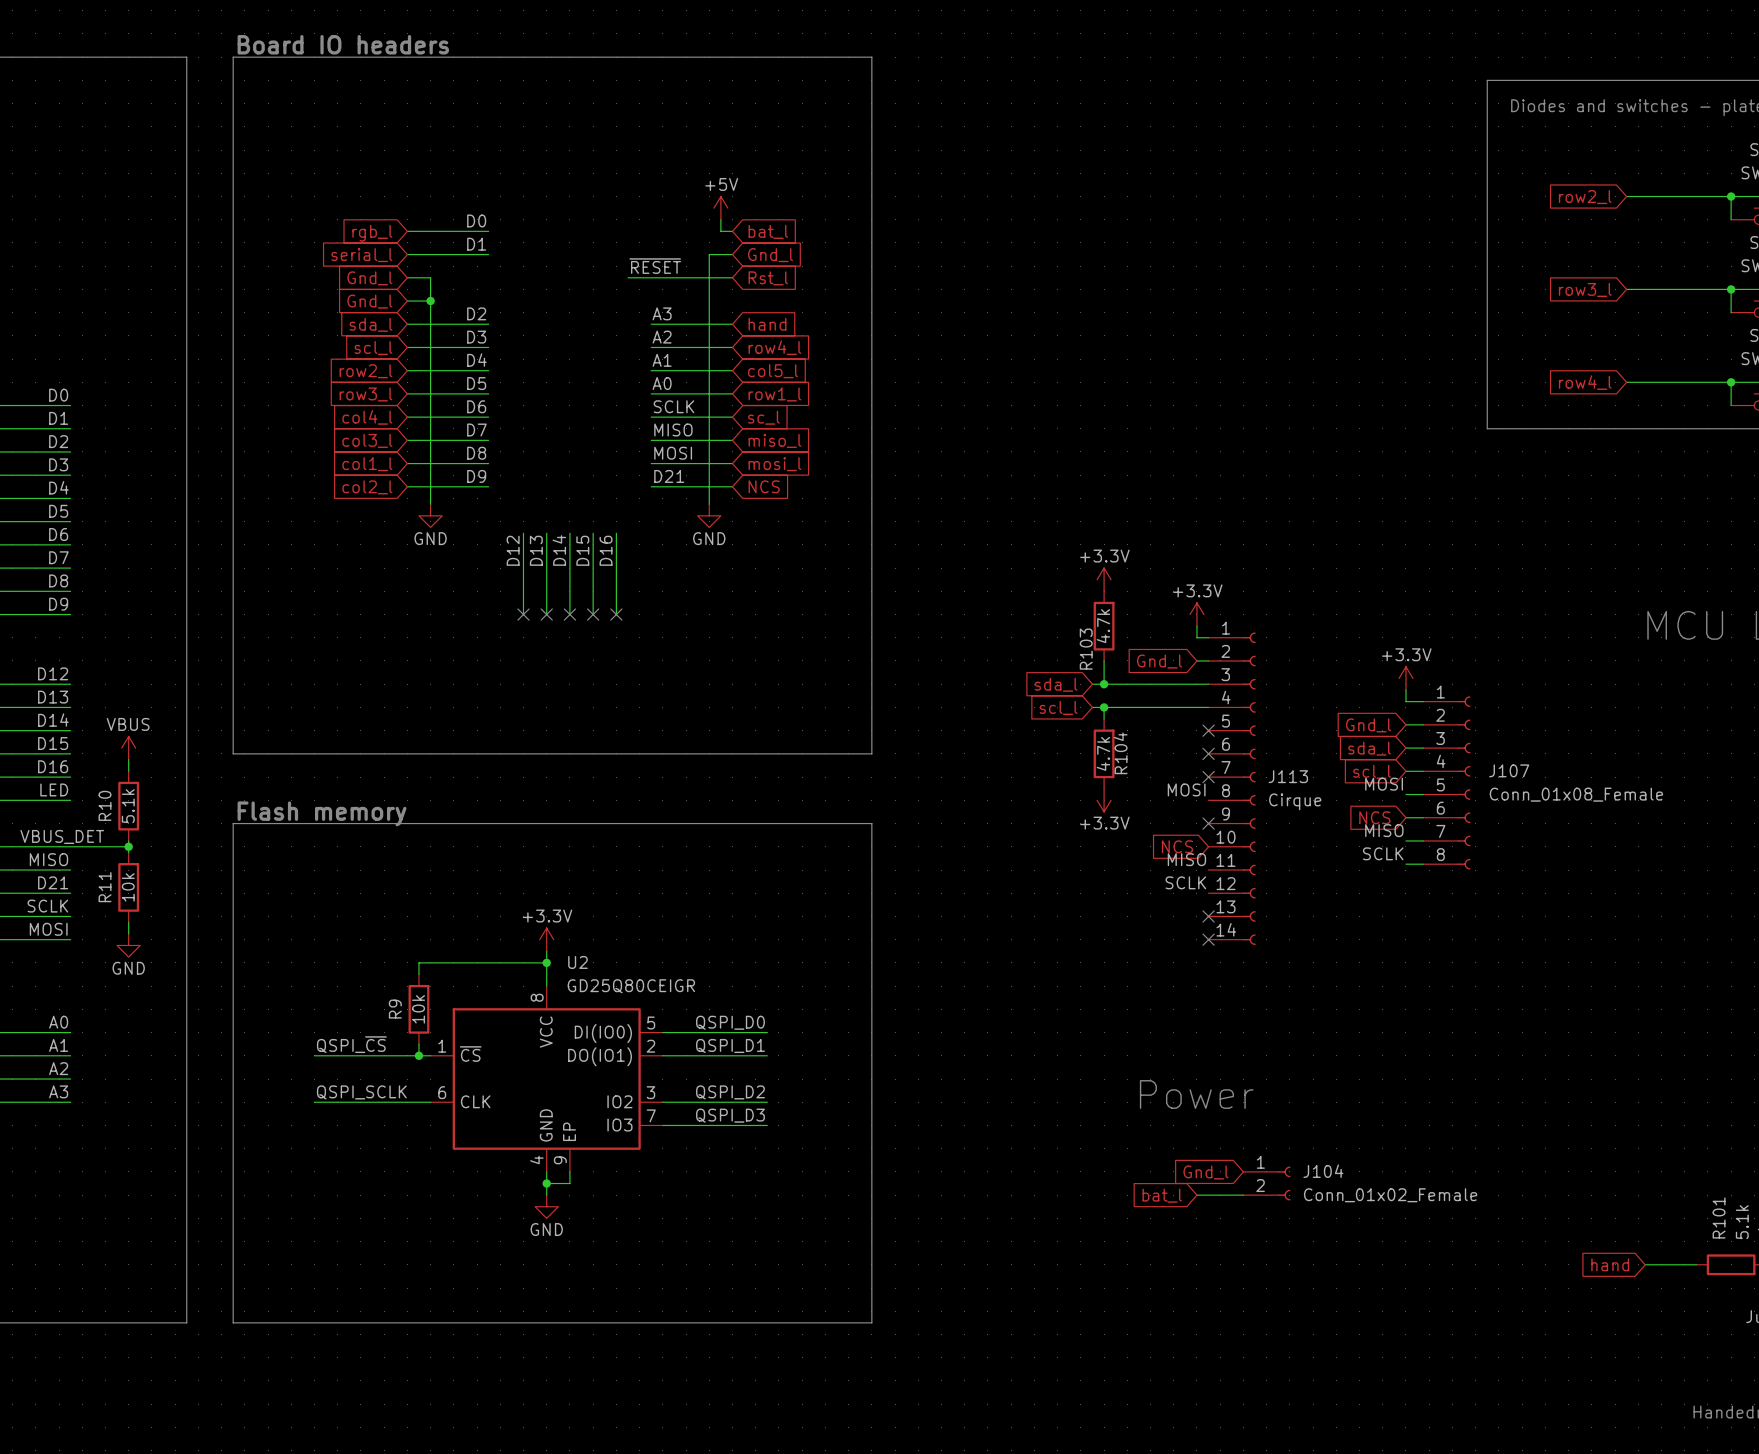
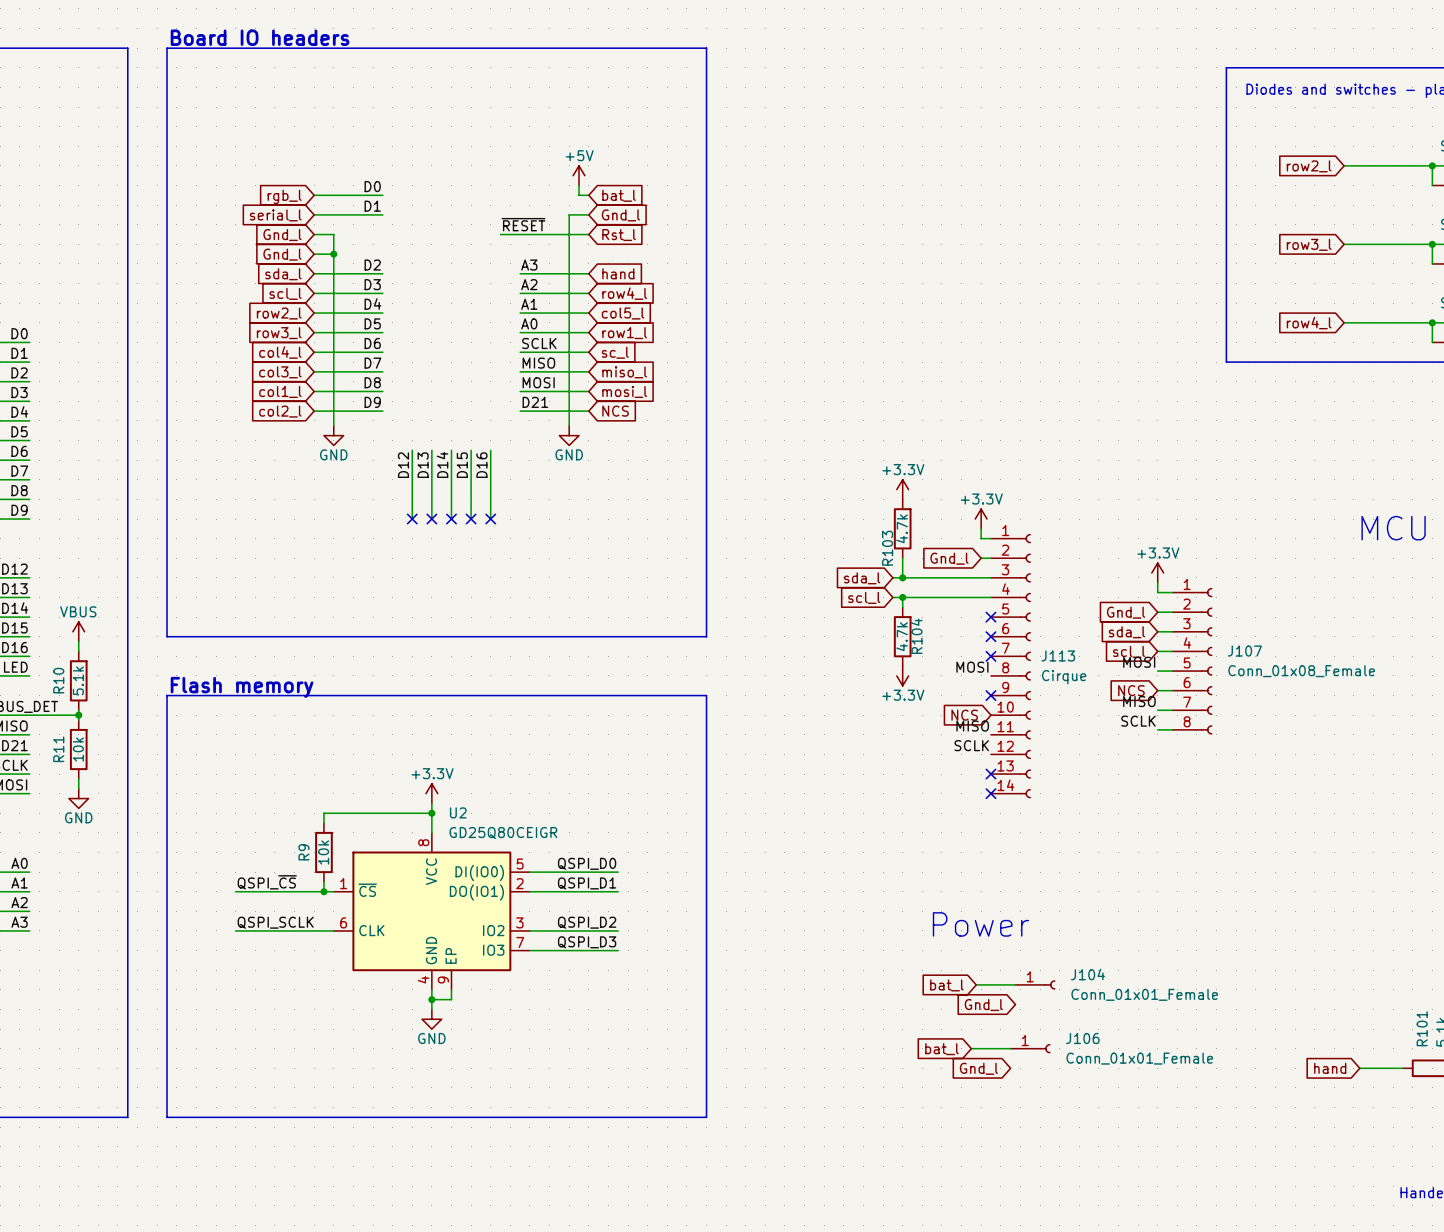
global label: none -> bat_l (946, 985)
J104 symbol: [1243, 1166, 1291, 1201] -> [1015, 980, 1056, 990]
global label position: Gnd_l (1205, 1172) -> Gnd_l (983, 1005)
global label: bat_l (1162, 1195) -> none
wire: (1196, 1195) (1243, 1195) -> (976, 984) (1015, 984)
J104 value: Conn_01x02_Female (1390, 1195) -> Conn_01x01_Female (1144, 994)
wire: none -> (971, 1048) (1010, 1048)
J106: none -> Conn_01x01_Female (1030, 1048)
global label: none -> bat_l (942, 1049)
global label: none -> Gnd_l (978, 1068)

